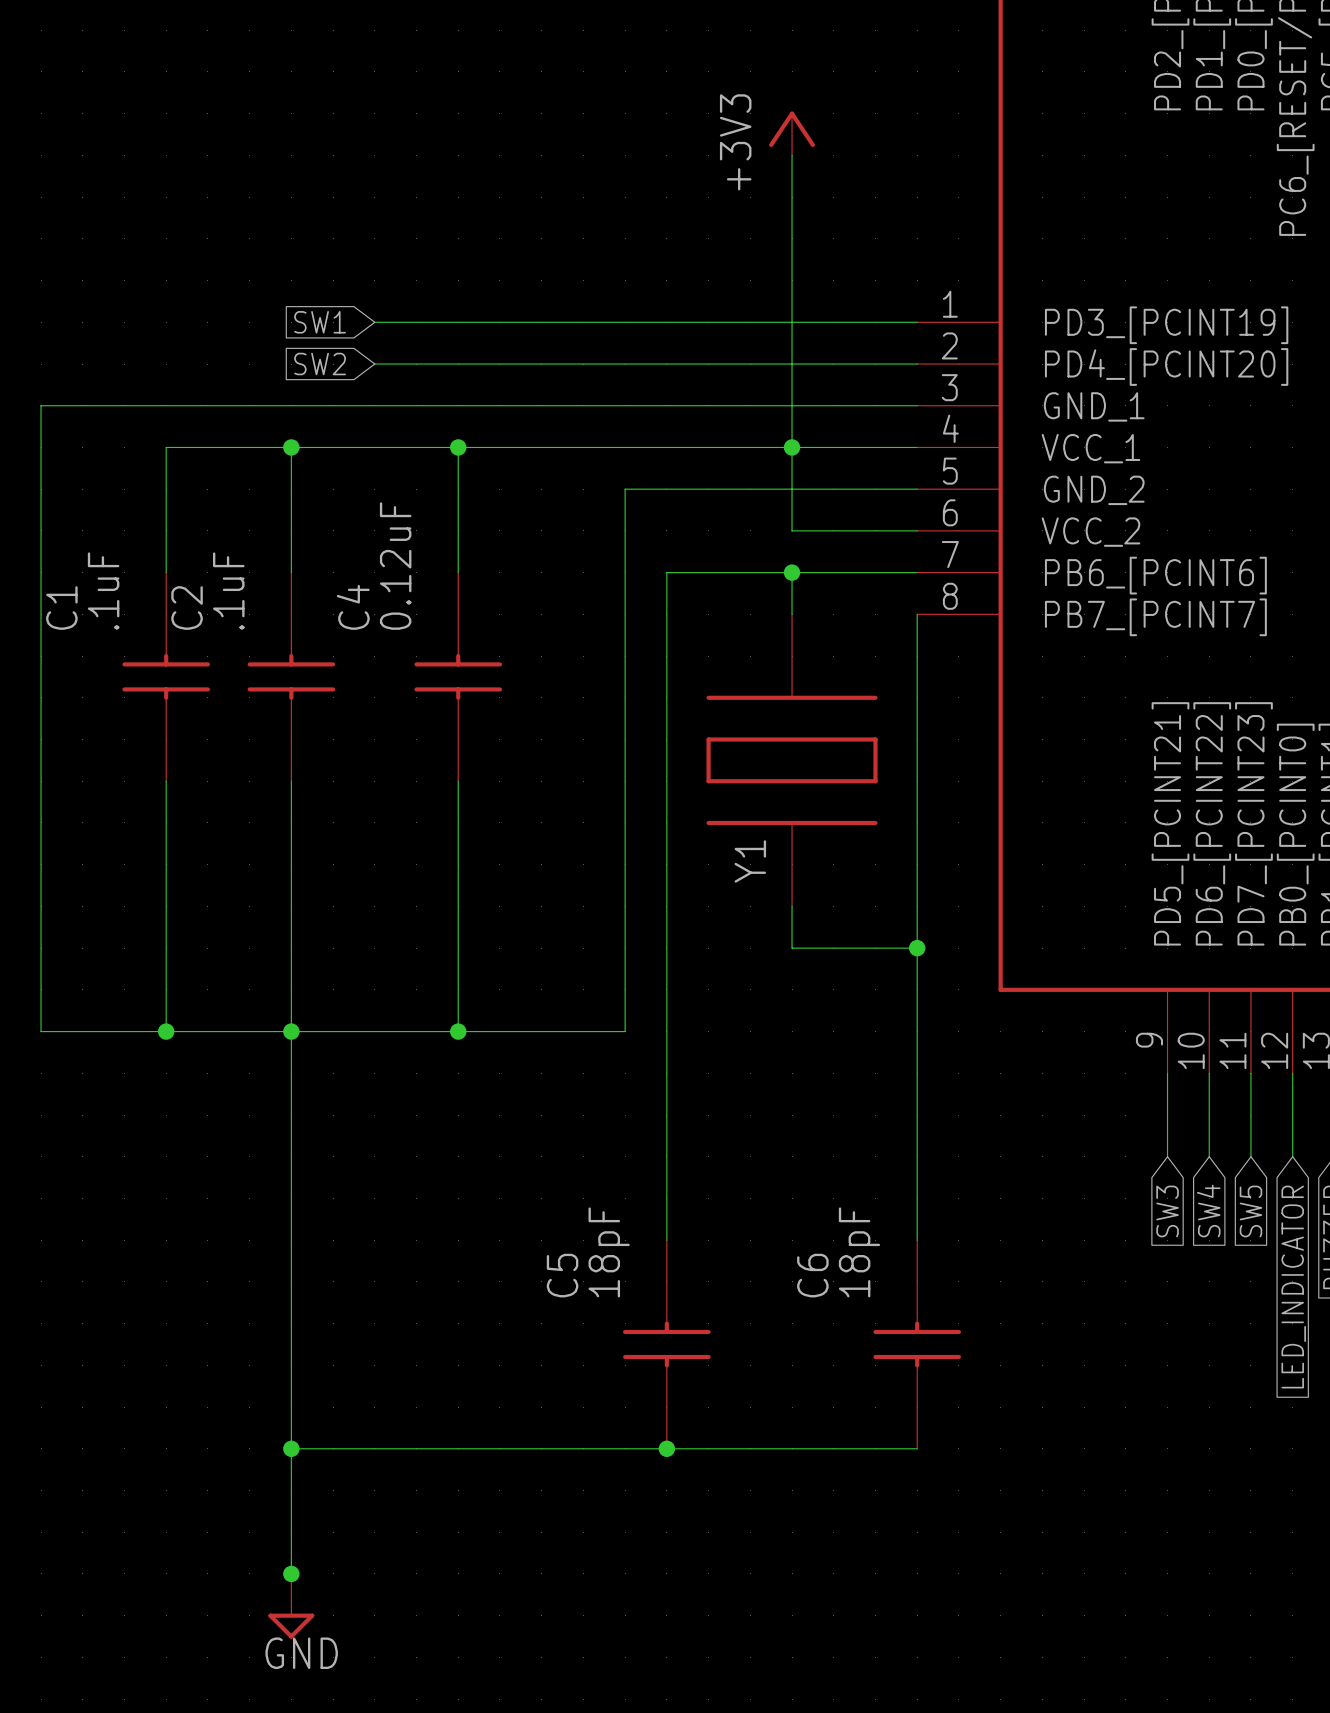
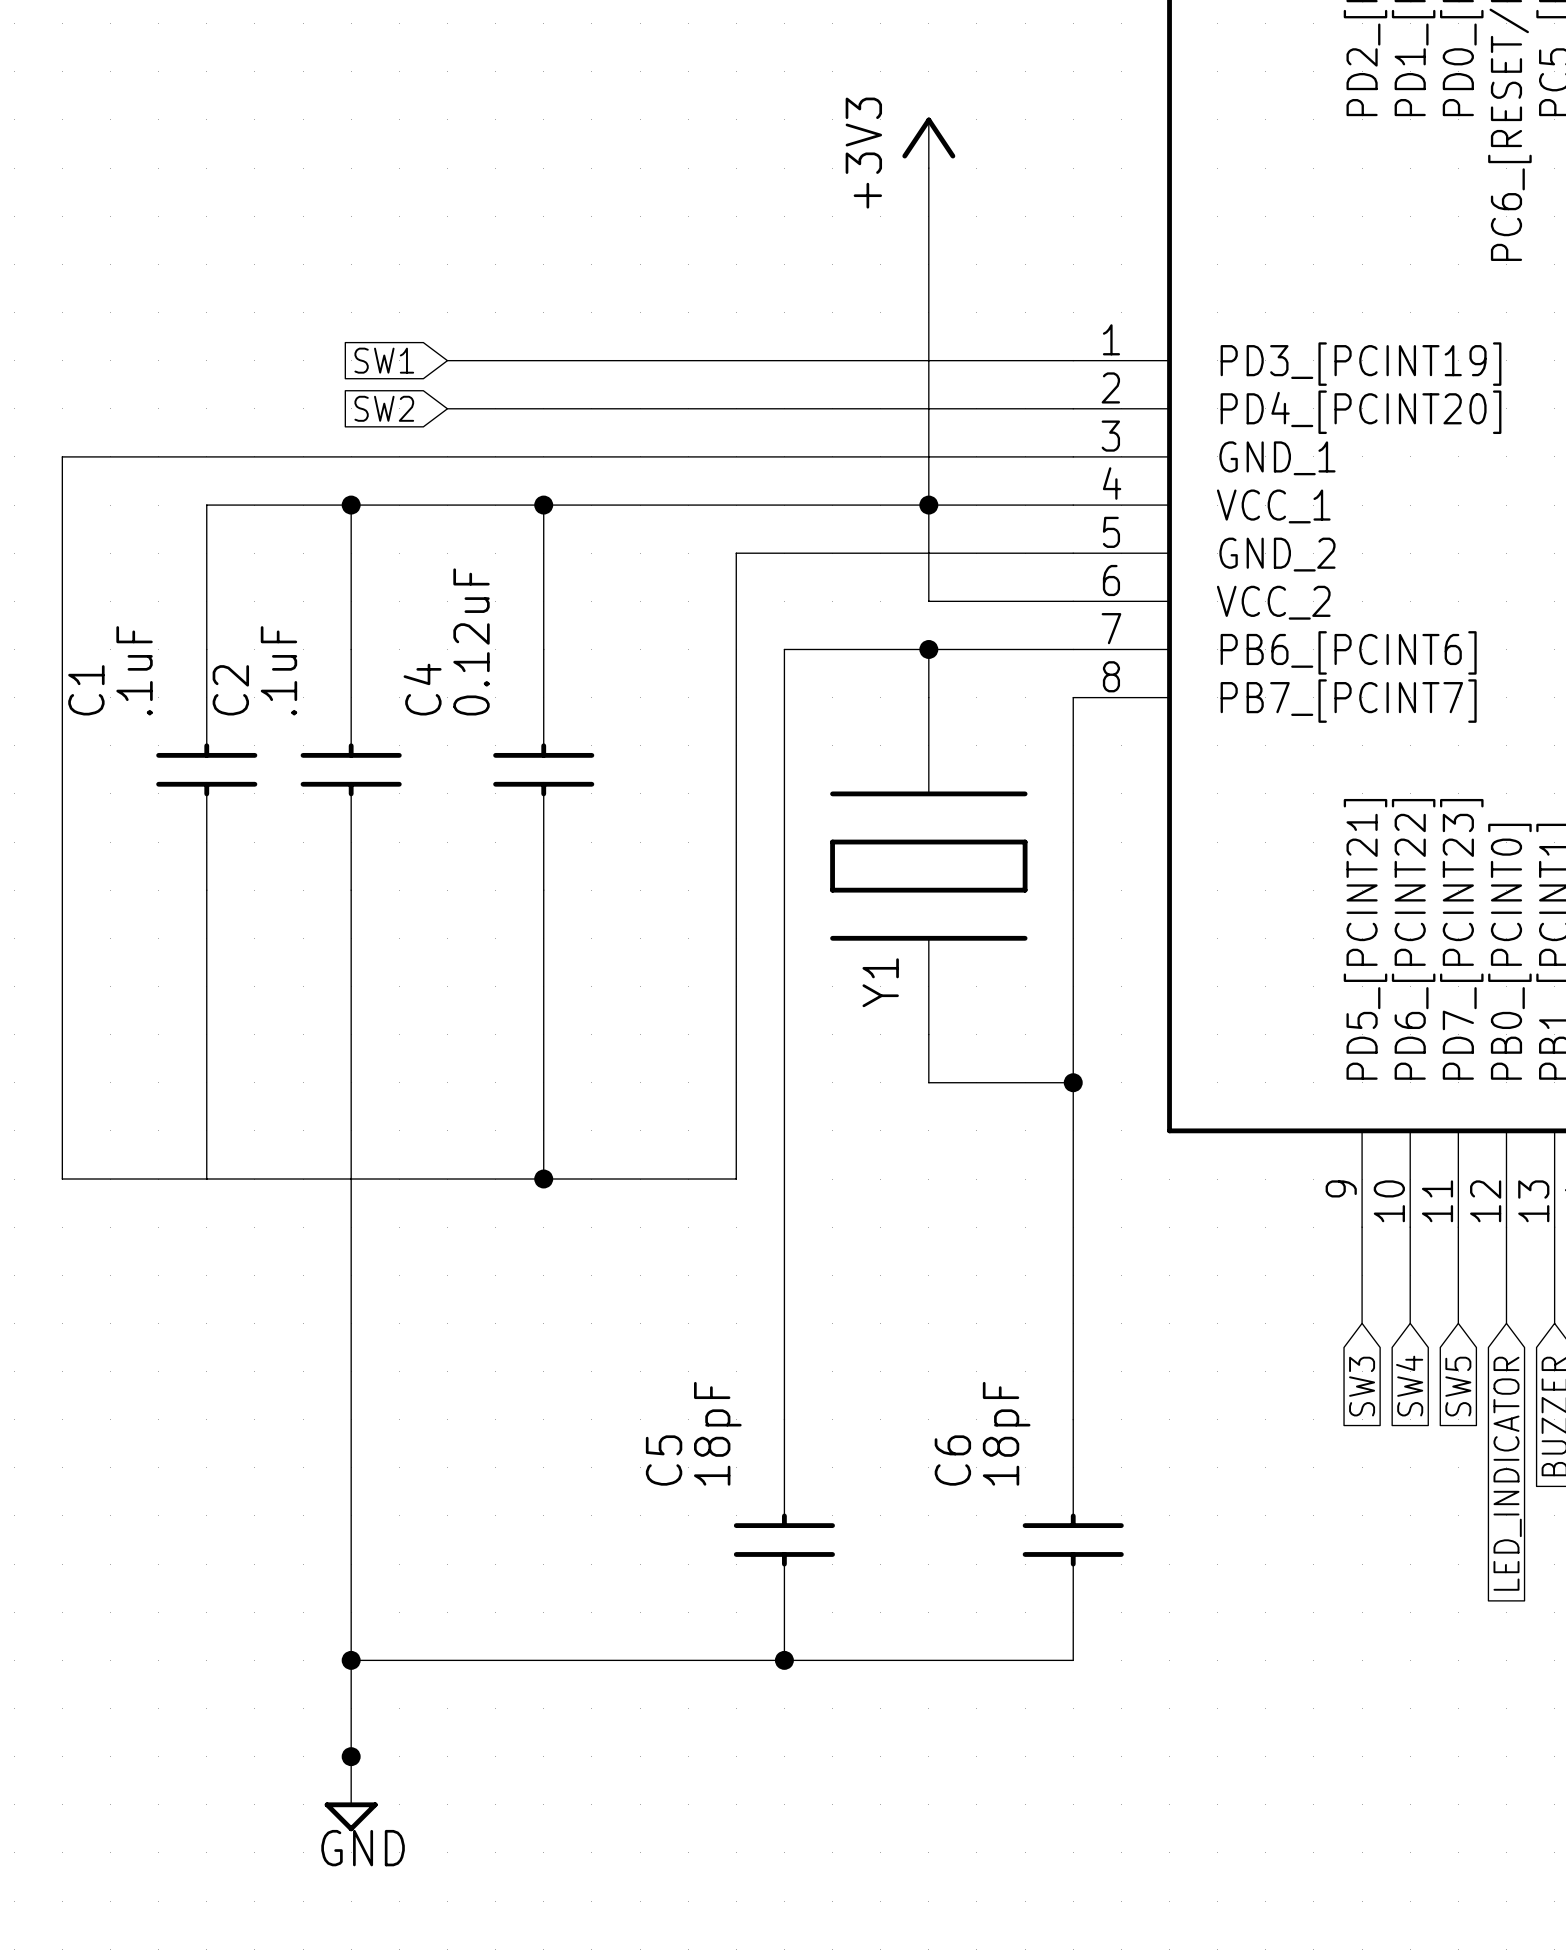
junction: (166, 1031) -> none
junction: (291, 1031) -> none
junction position: (291, 1573) -> (351, 1756)
power symbol position: GND (291, 1606) -> GND (351, 1793)

